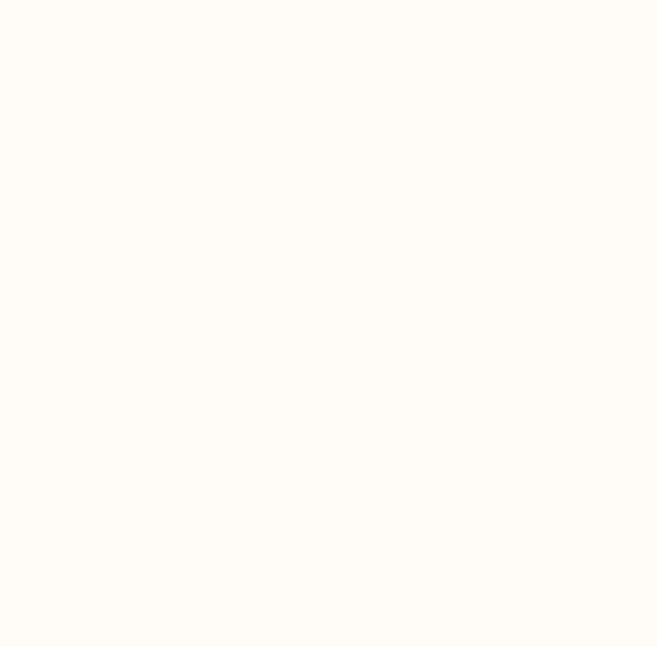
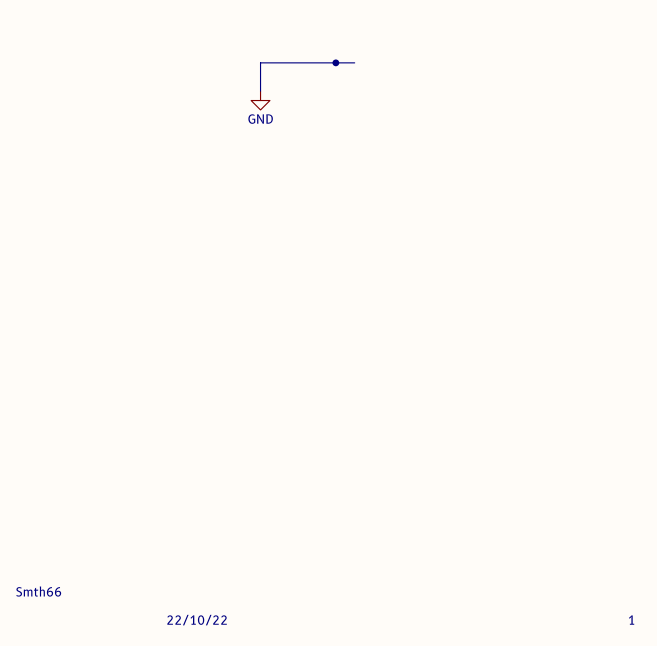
junction: none -> (335, 62)
wire: none -> (354, 62) (260, 62) (260, 91)
power symbol: none -> GND (260, 100)
text: none -> Smth66 (38, 591)
text: none -> 22/10/22 (197, 620)
text: none -> 1 (631, 620)

